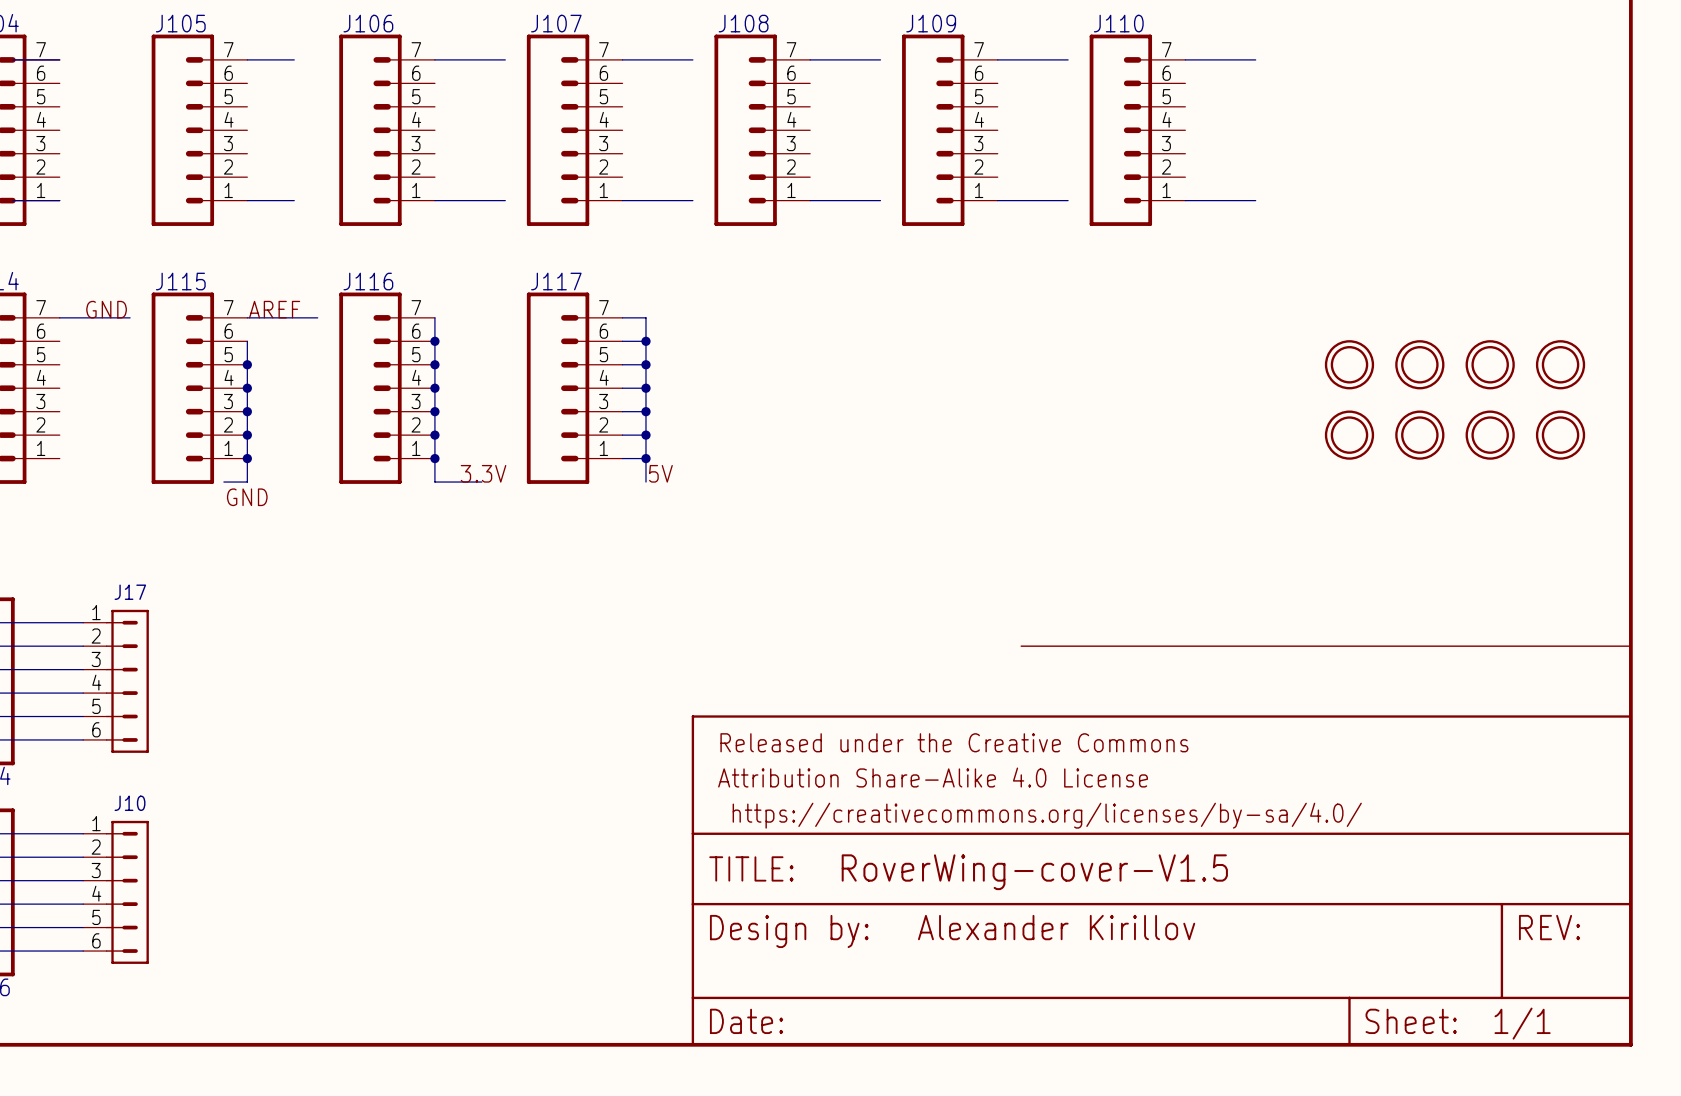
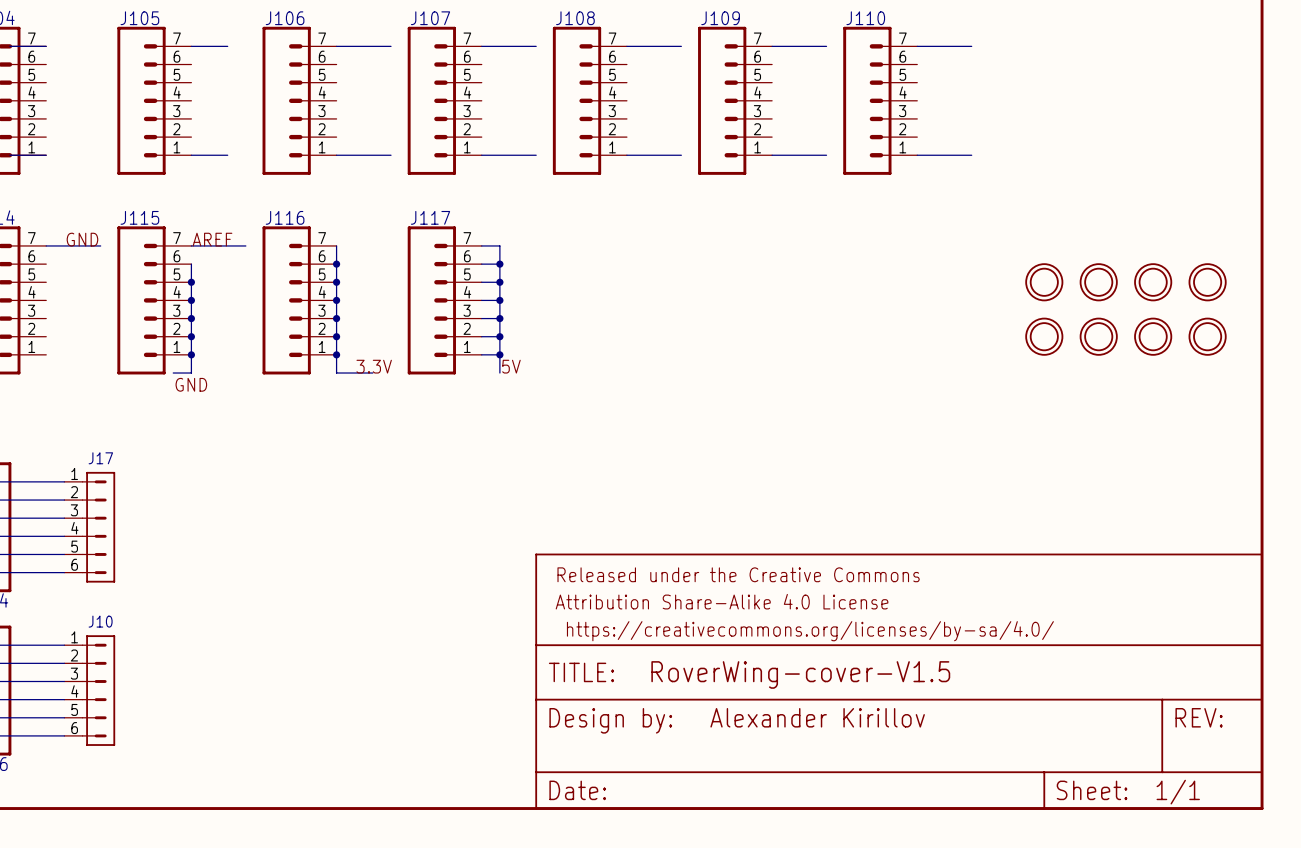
line: (1021, 646) (1630, 646) -> none

